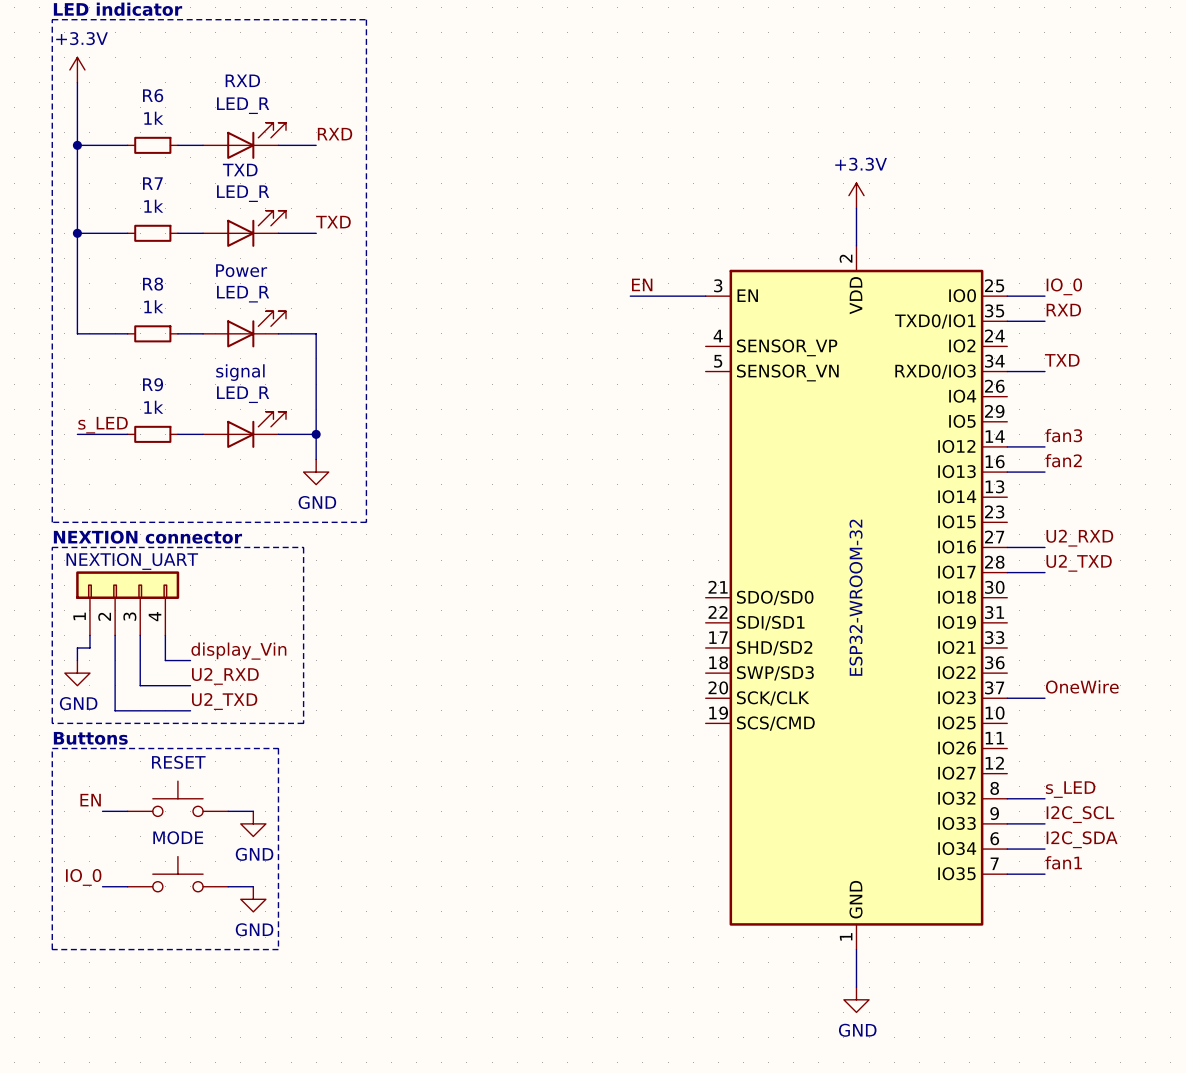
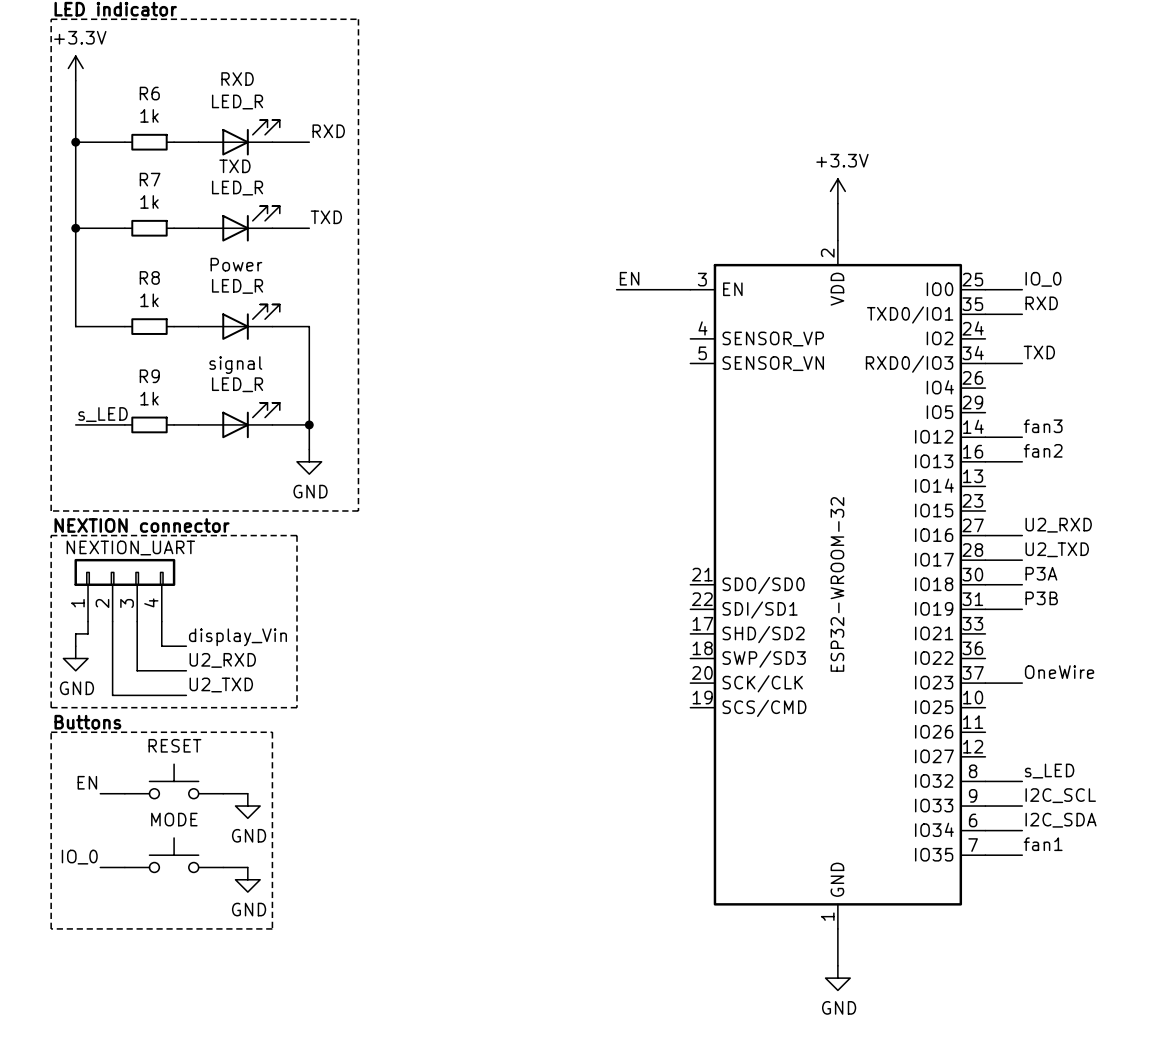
label: none -> P3A (1041, 573)
wire: none -> (985, 584) (1022, 584)
label: none -> P3B (1041, 598)
wire: none -> (985, 609) (1022, 609)

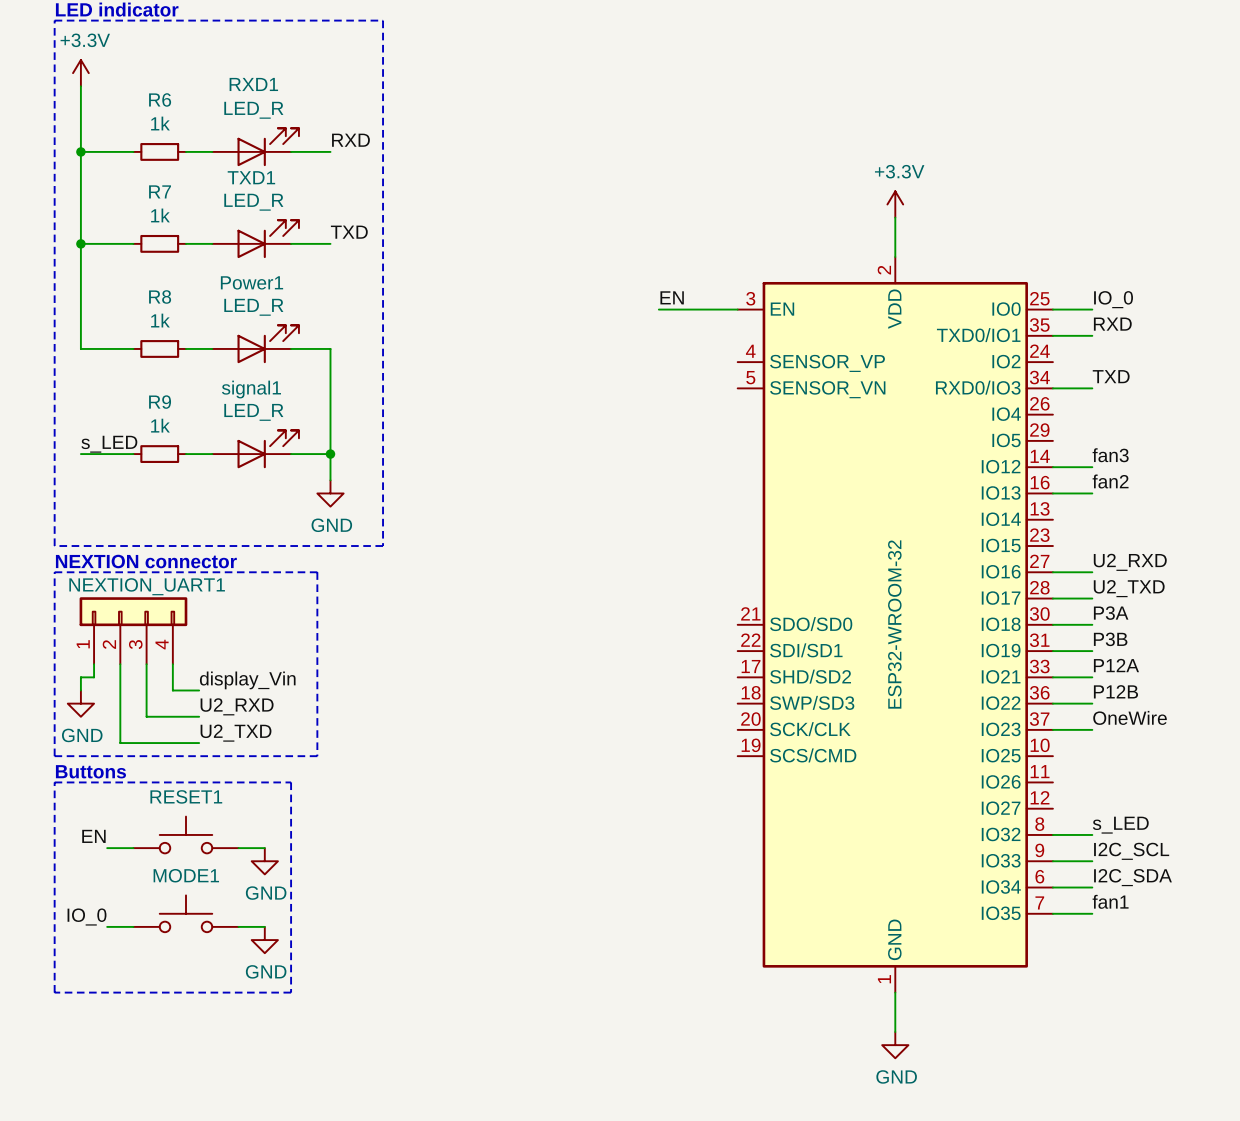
RXD name: RXD (237, 79) -> RXD1 (253, 84)
TXD name: TXD (234, 166) -> TXD1 (251, 177)
Power name: Power (236, 264) -> Power1 (251, 282)
signal name: signal (235, 365) -> signal1 (251, 389)
NEXTION_UART name: NEXTION_UART (130, 547) -> NEXTION_UART1 (147, 586)
label: none -> P12A (1116, 665)
wire: none -> (1052, 677) (1092, 677)
label: none -> P12B (1115, 691)
wire: none -> (1052, 703) (1092, 703)
RESET name: RESET (174, 745) -> RESET1 (186, 796)
MODE name: MODE (174, 819) -> MODE1 (186, 875)

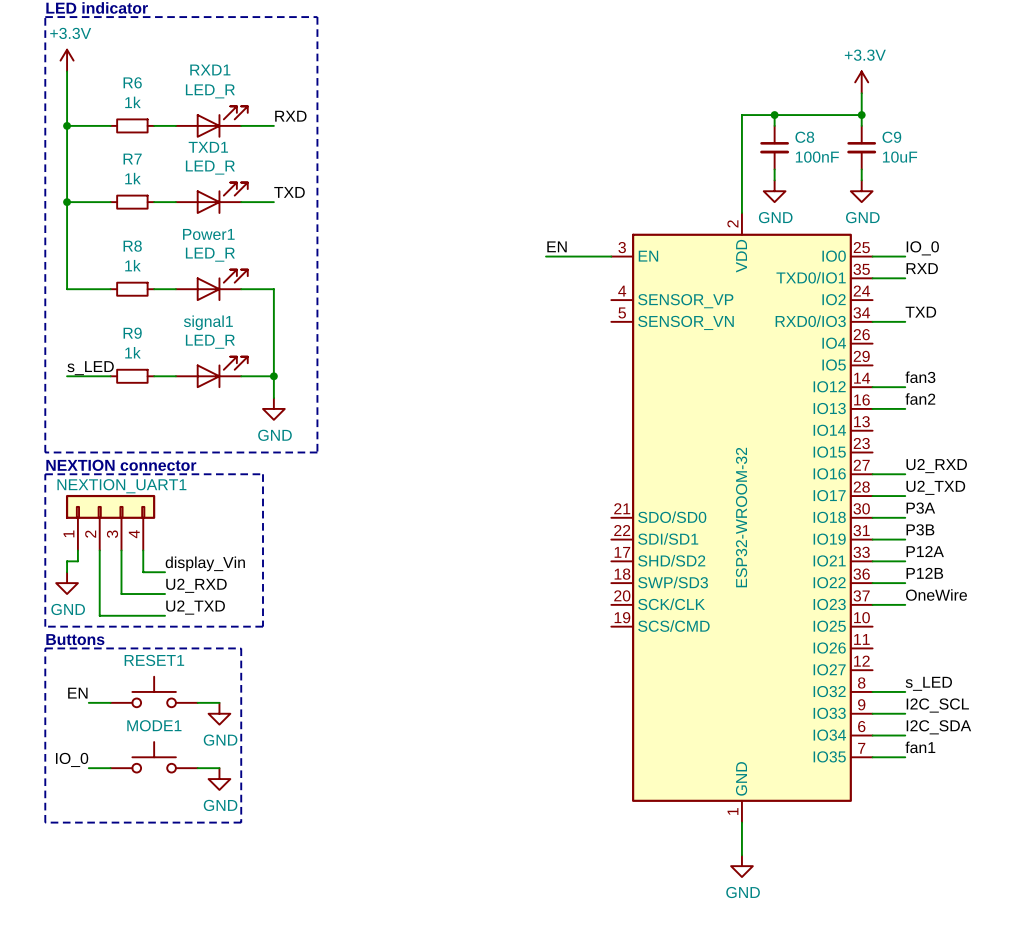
wire: none -> (861, 93) (861, 125)
wire: none -> (774, 115) (774, 125)
junction: none -> (774, 115)
wire: none -> (861, 115) (741, 115) (741, 180)
junction: none -> (861, 115)
C8: none -> 100nF (774, 147)
C9: none -> 10uF (861, 147)
power symbol position: +3.3V (895, 204) -> +3.3V (861, 82)
wire: none -> (774, 169) (774, 180)
wire: none -> (861, 169) (861, 180)
power symbol: none -> GND (774, 191)
power symbol: none -> GND (861, 191)

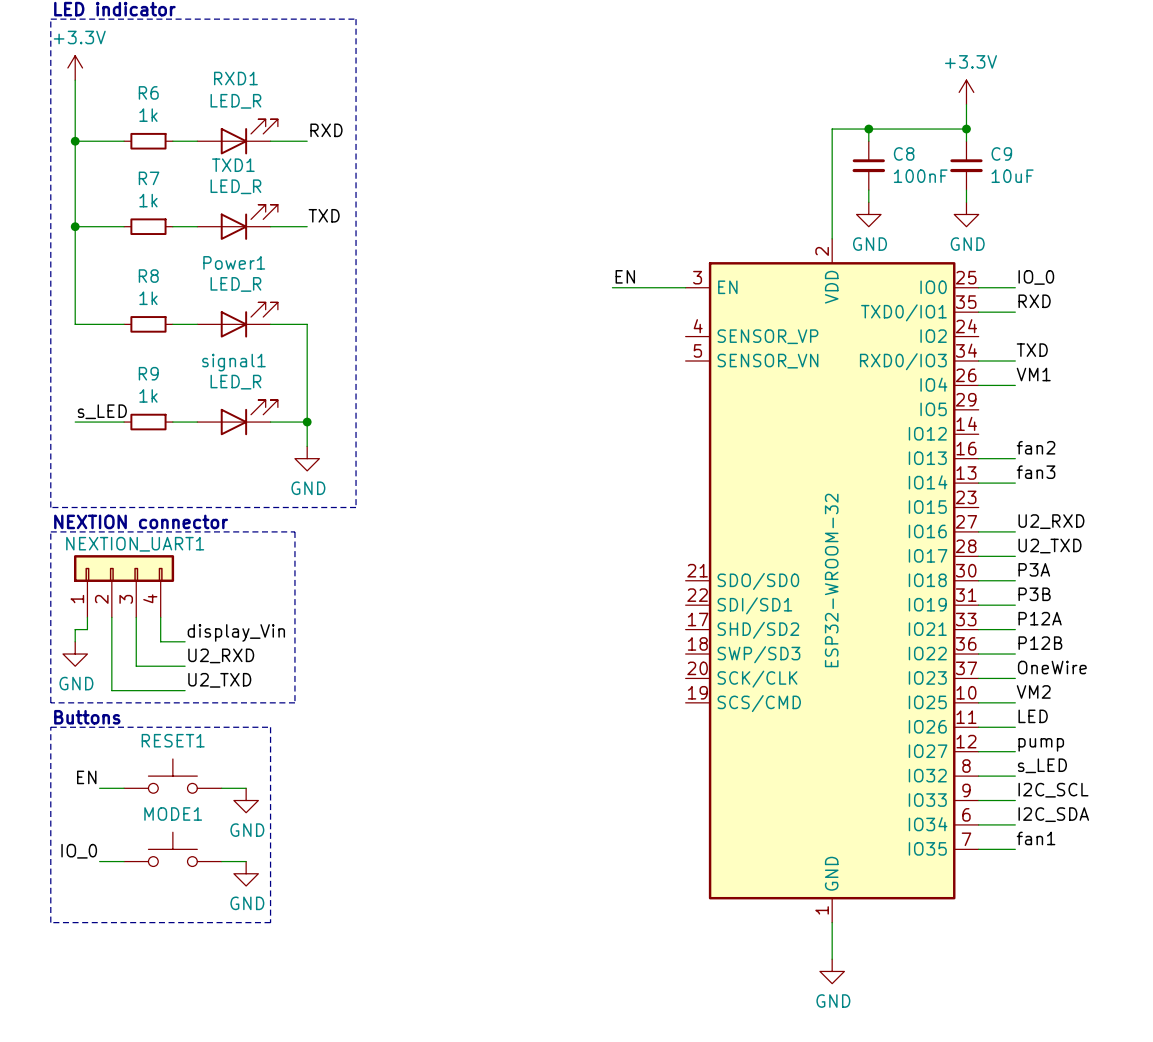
label: none -> VM1 (1033, 374)
label position: fan3 (920, 377) -> fan3 (1036, 472)
wire: (872, 387) (905, 387) -> (978, 385) (1015, 385)
wire: none -> (978, 483) (1015, 483)
label: none -> VM2 (1033, 691)
wire: none -> (978, 702) (1015, 702)
label: none -> LED (1033, 716)
wire: none -> (978, 727) (1015, 727)
label: none -> pump (1041, 744)
wire: none -> (978, 751) (1015, 751)

